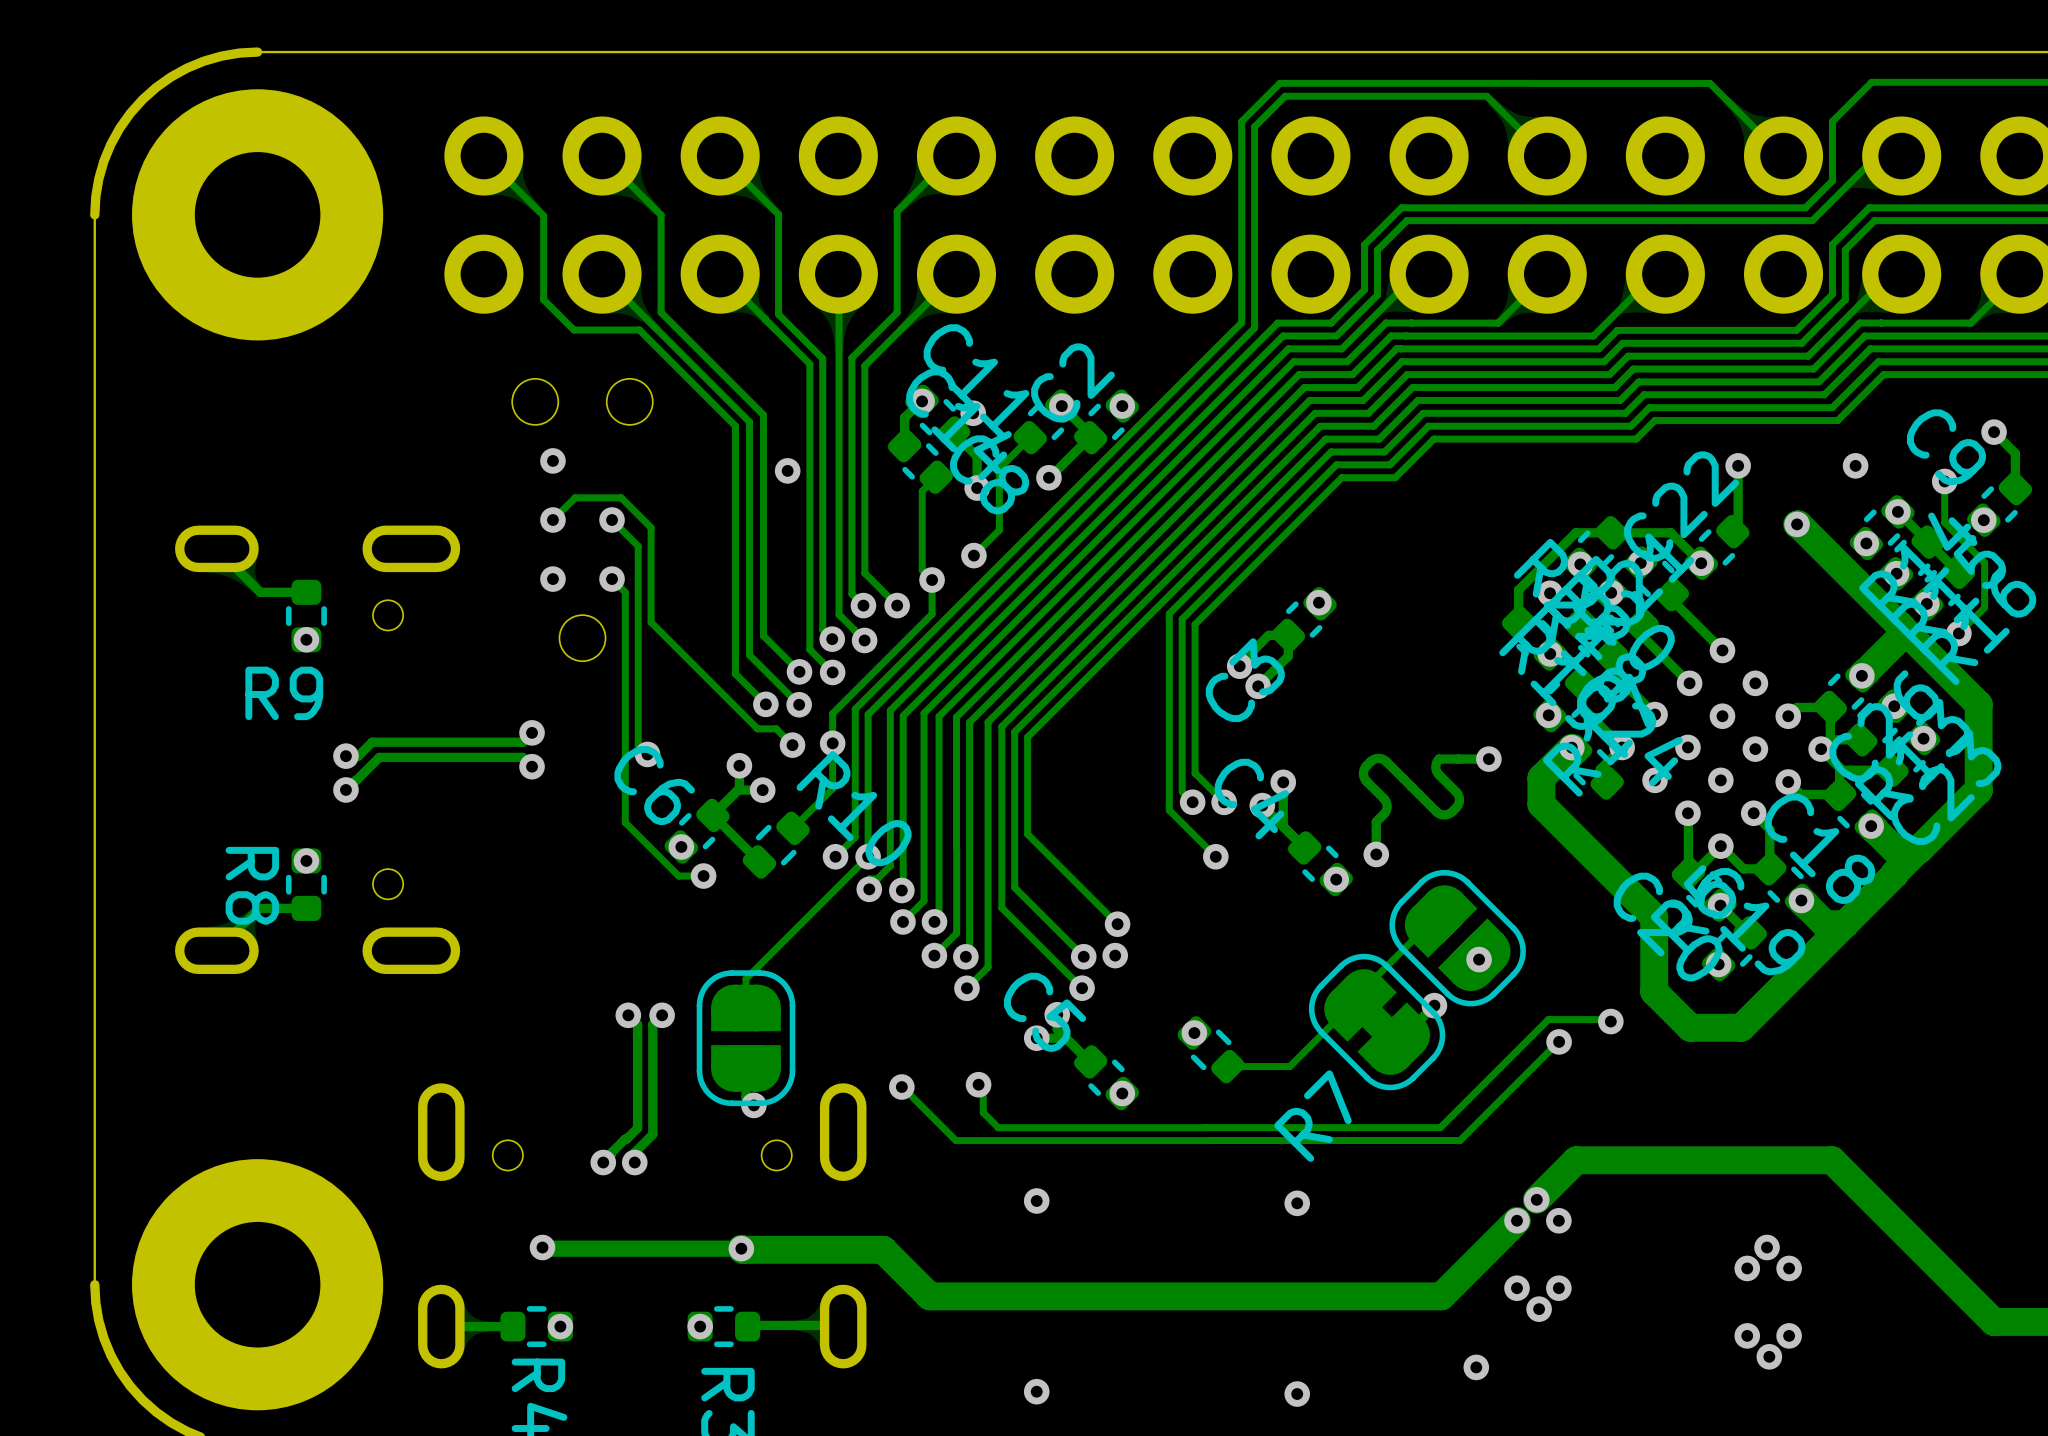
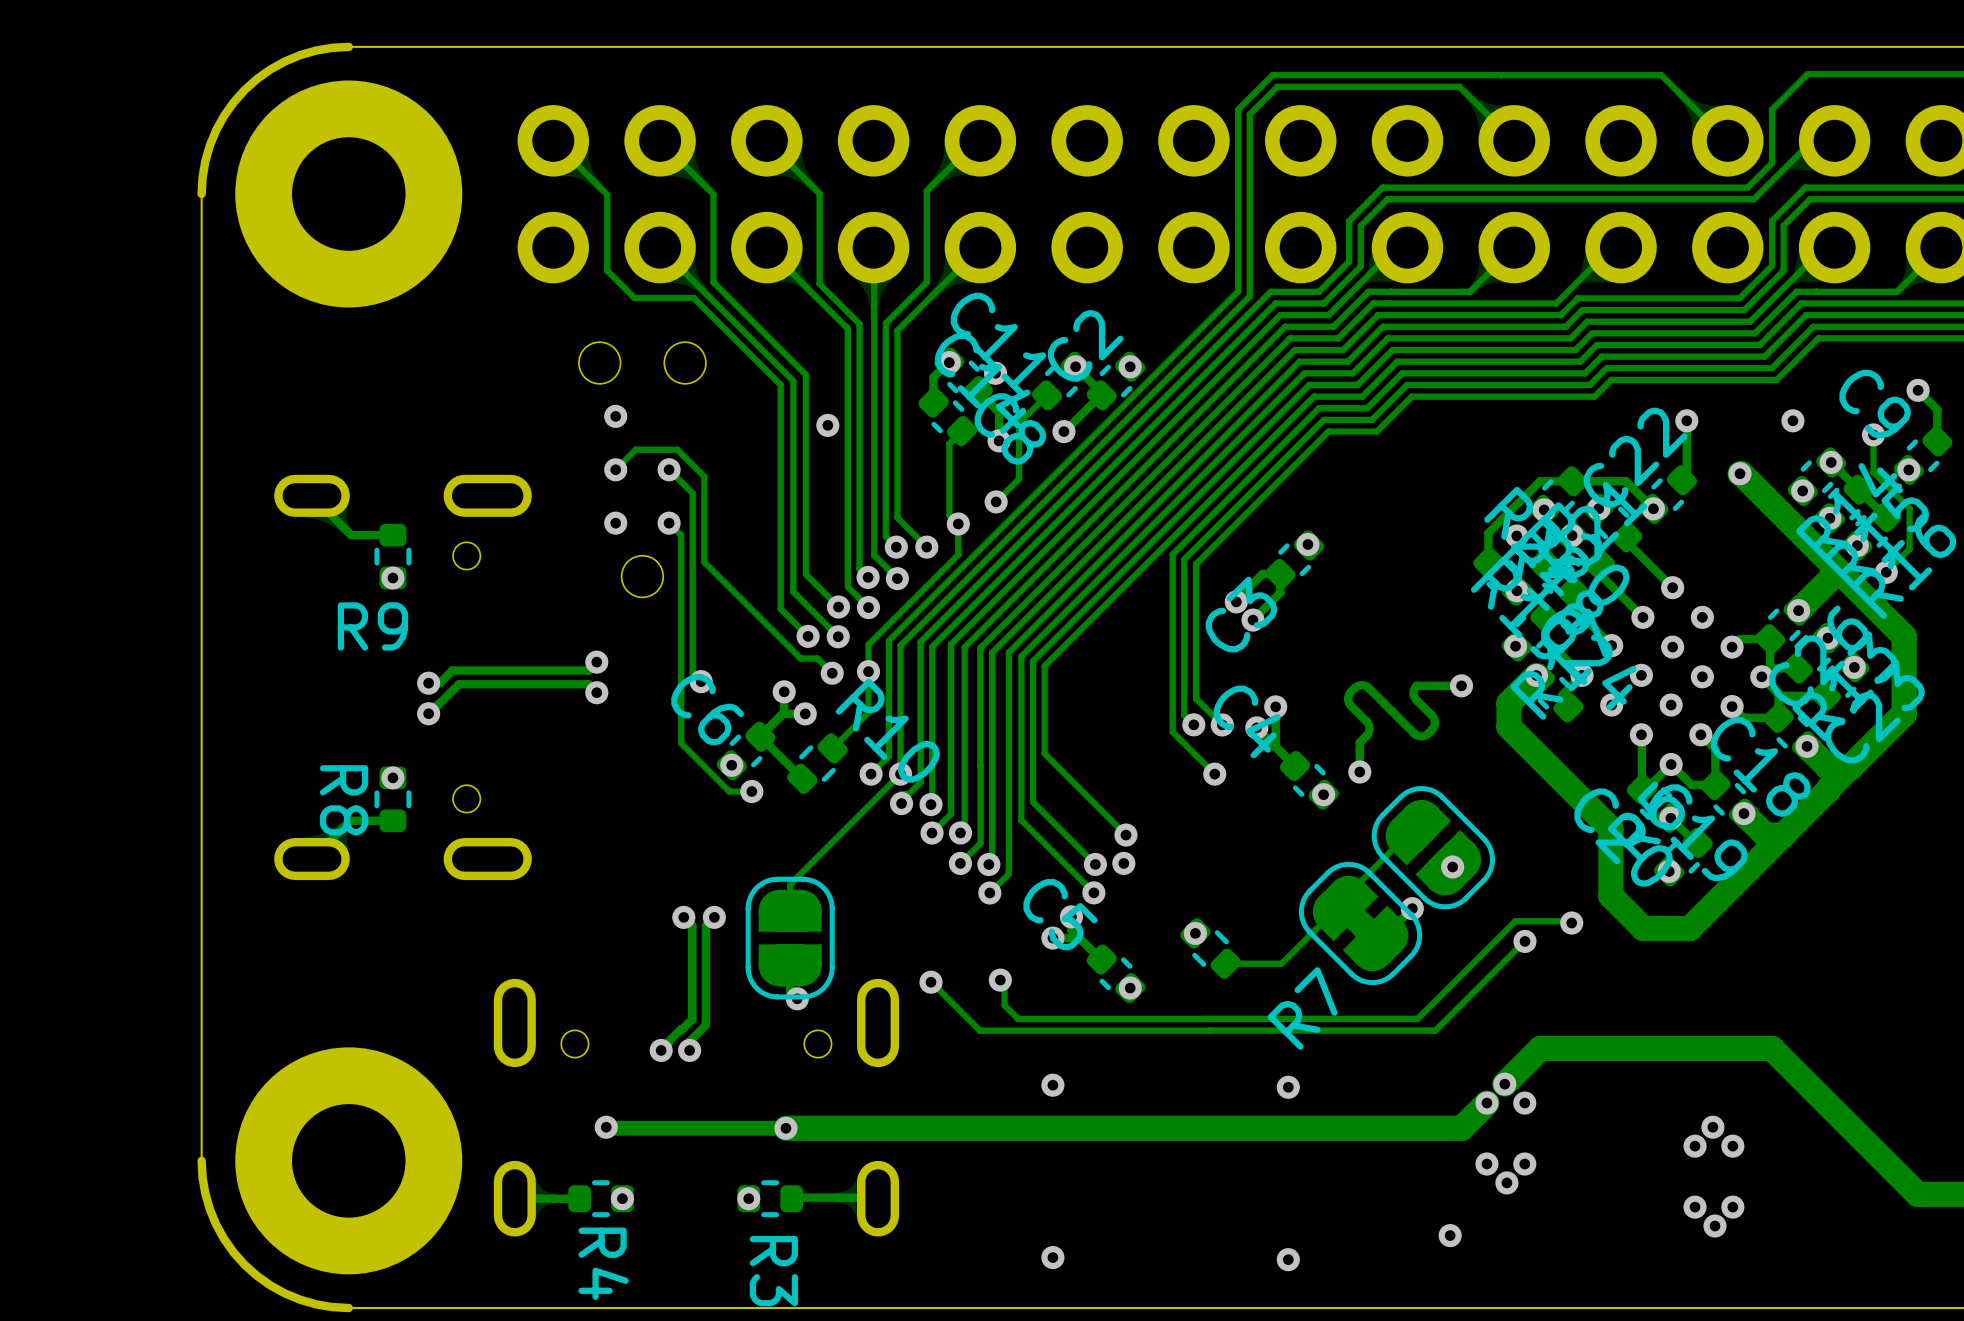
track: (1489, 1248) (1441, 1296) (929, 1296) (883, 1249) (741, 1248) -> (1461, 1128) (785, 1128)

